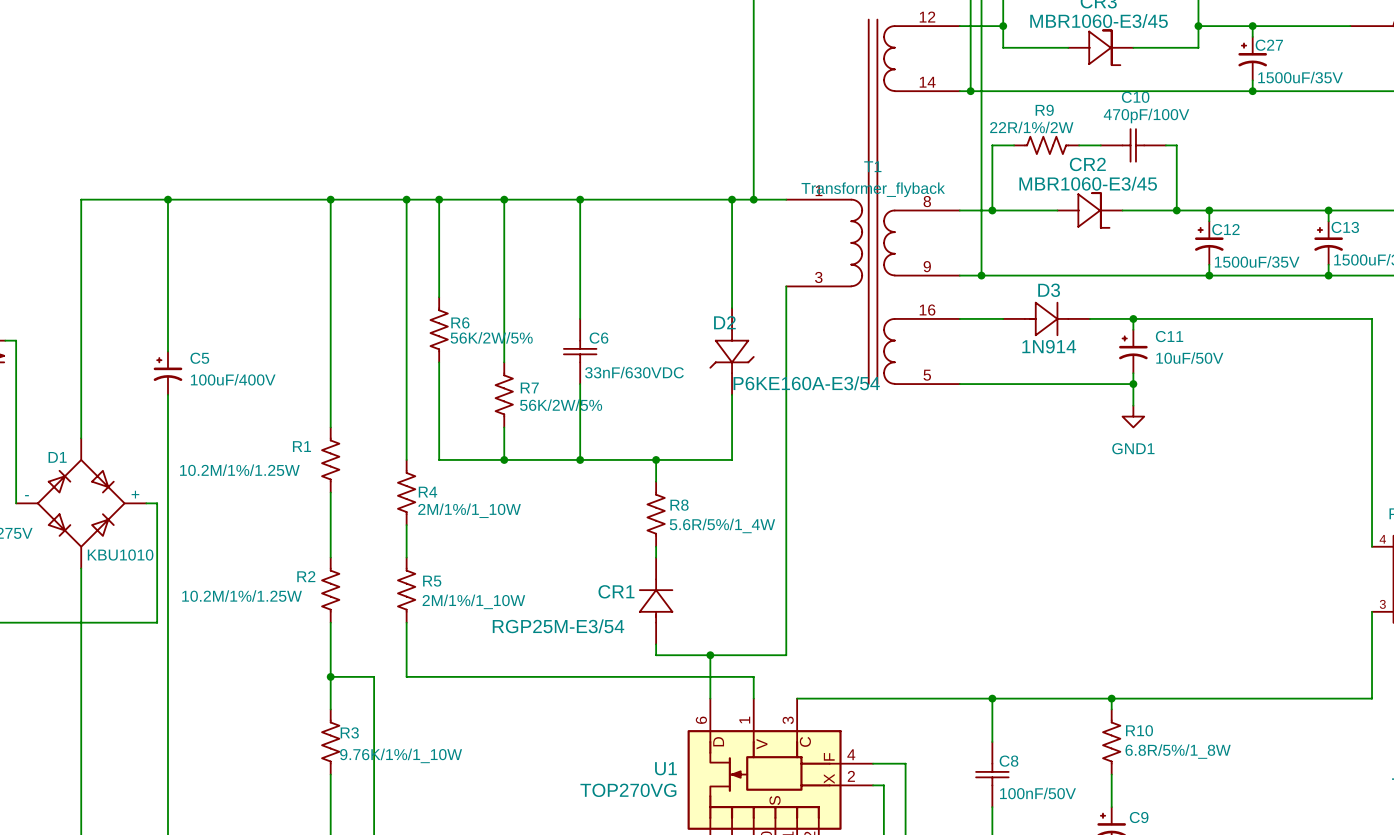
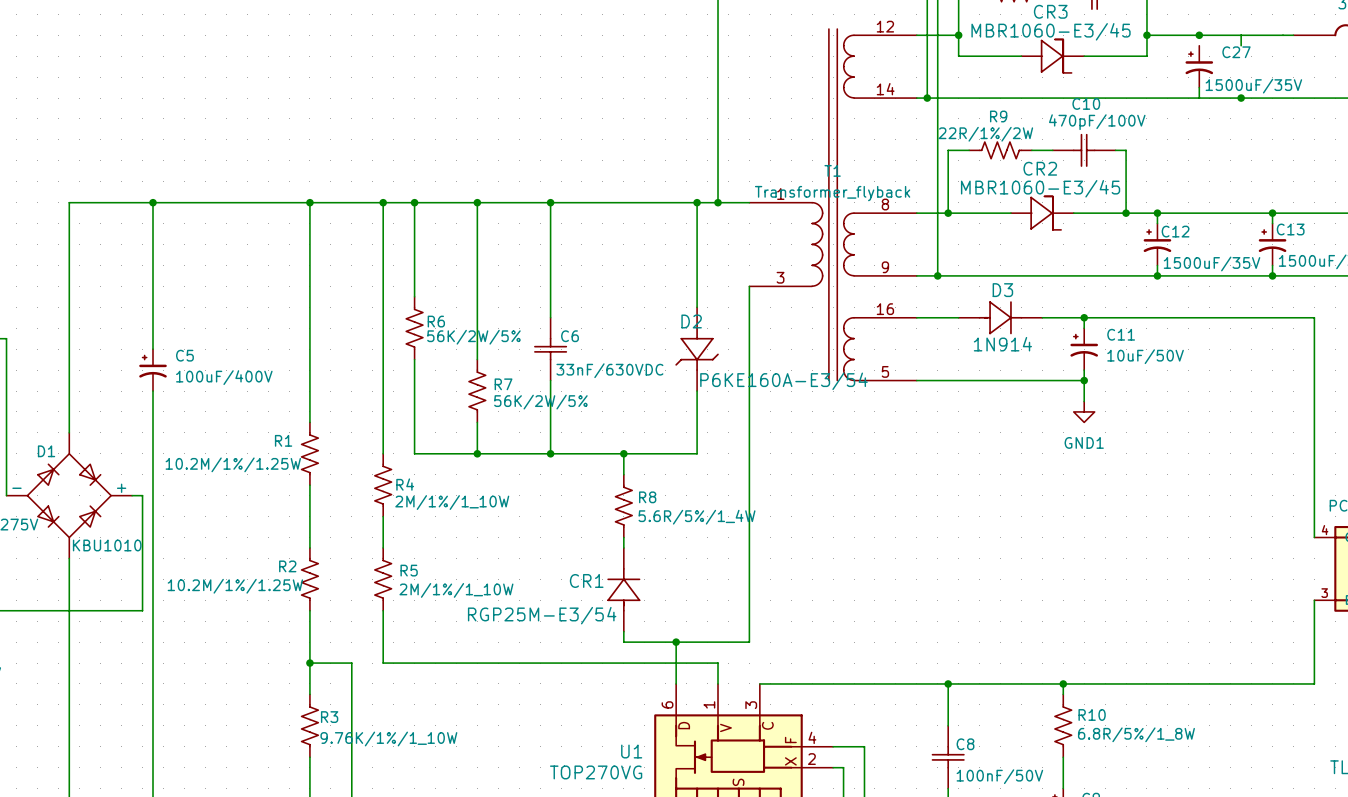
wire: (1252, 26) (1252, 36) -> (1241, 35) (1241, 45)
C27 name position: C27 (1269, 45) -> C27 (1236, 52)
junction position: (1252, 91) -> (1241, 98)

